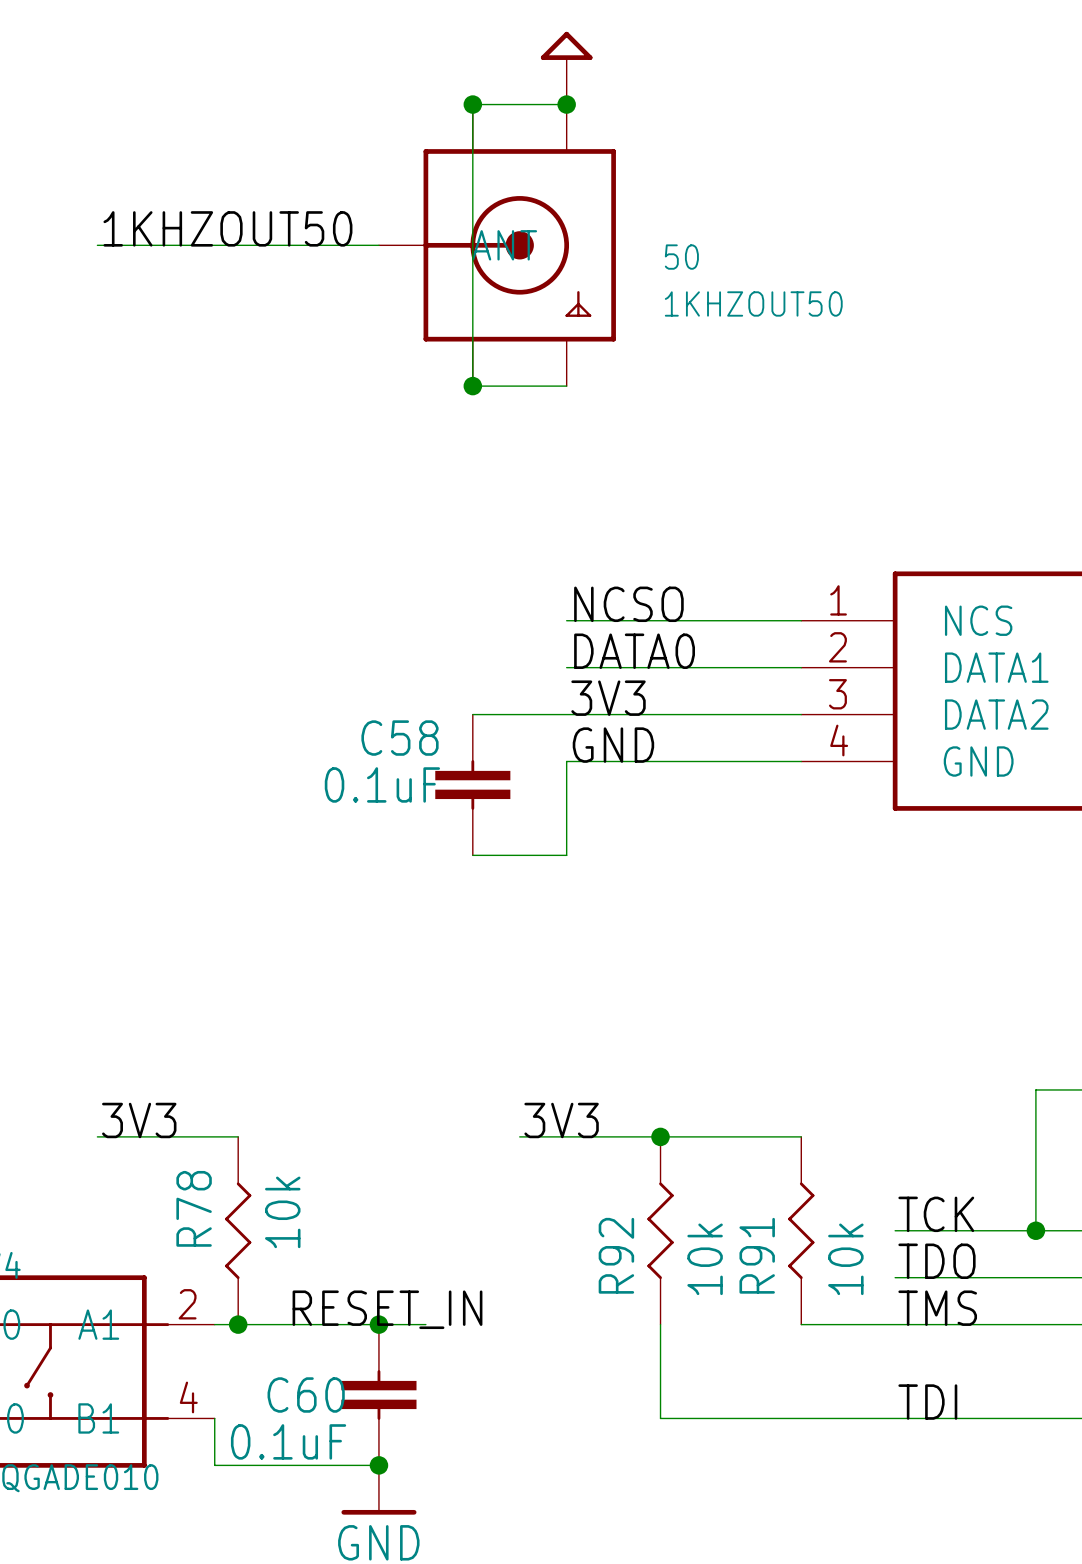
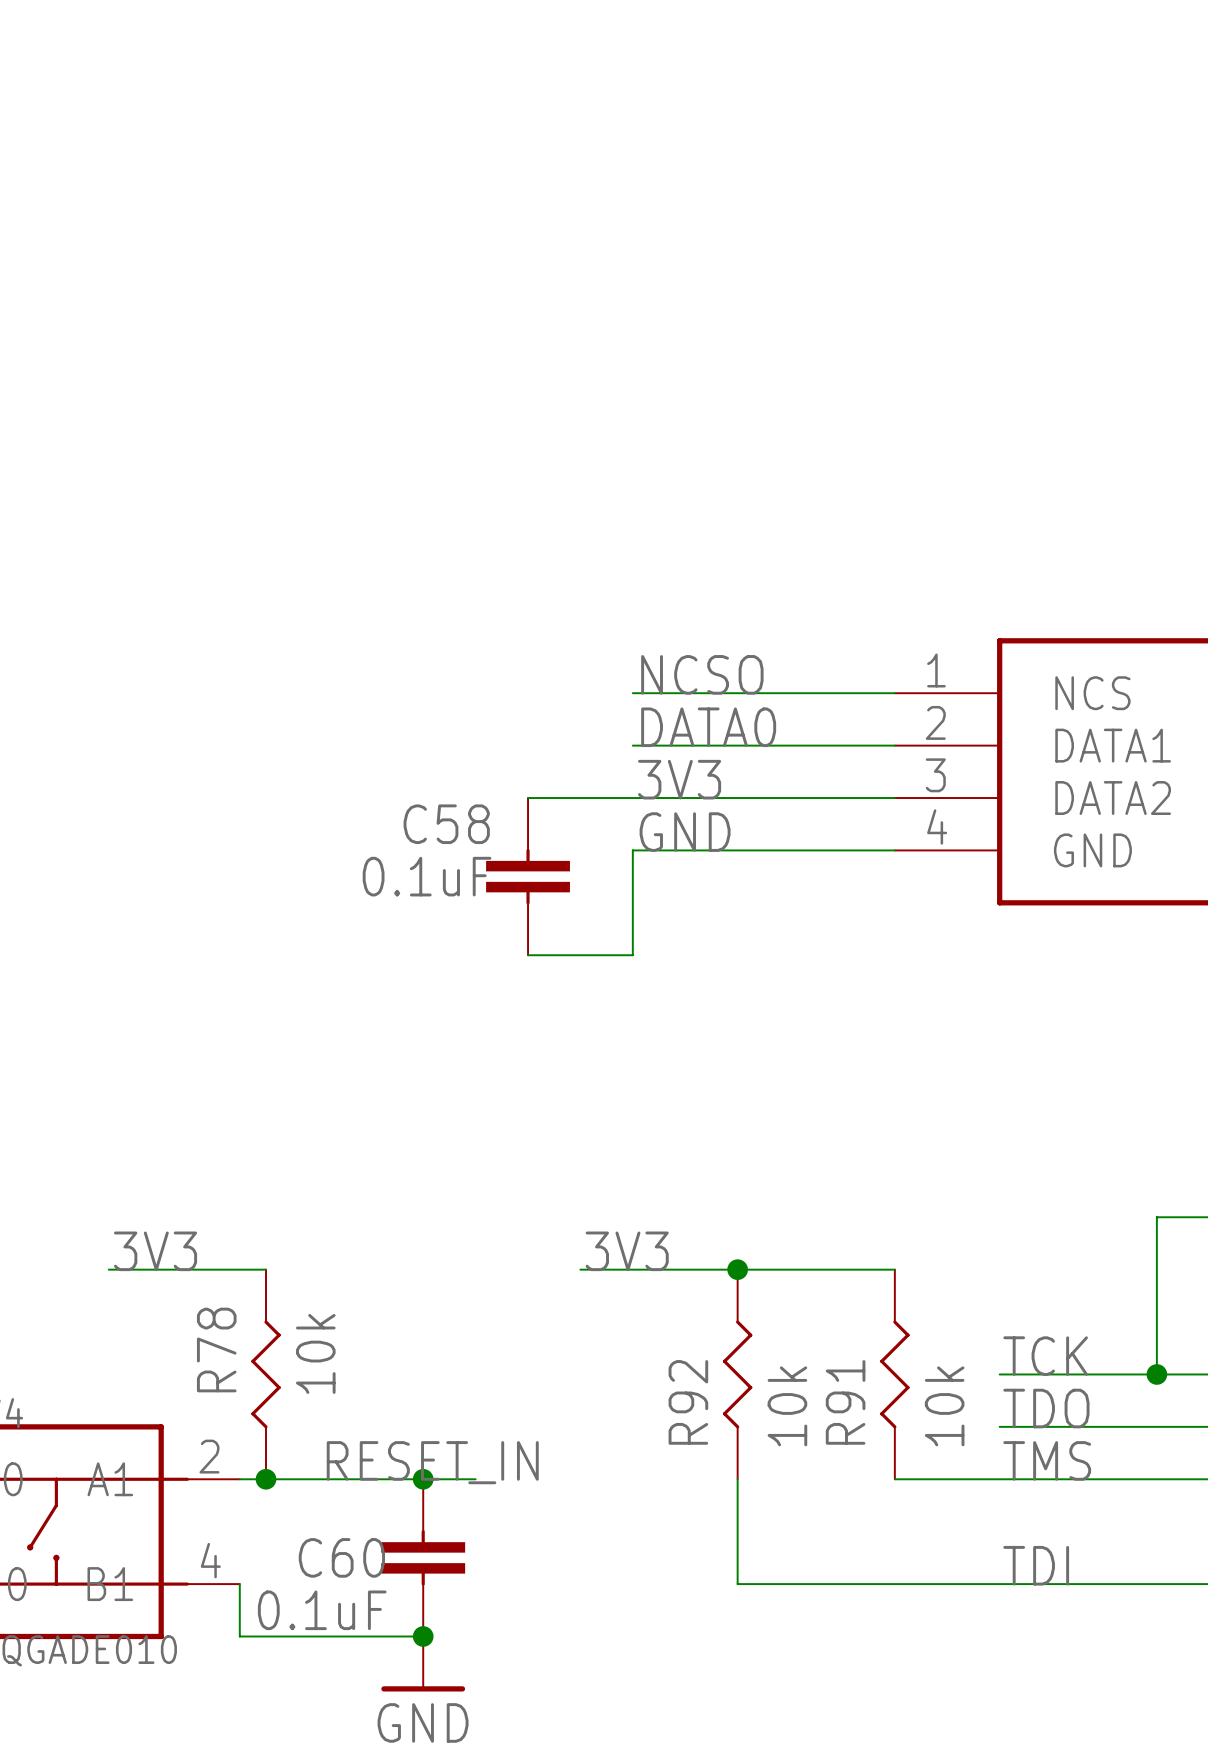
power symbol: (566, 68) -> none
junction: (472, 104) -> none
wire: (566, 104) (472, 104) (472, 386) (566, 386) -> none
junction: (566, 104) -> none
label: 1KHZOUT50 (227, 228) -> none
wire: (97, 245) (378, 245) -> none
1KHZOUT50: 50 (497, 245) -> none
junction: (472, 386) -> none

